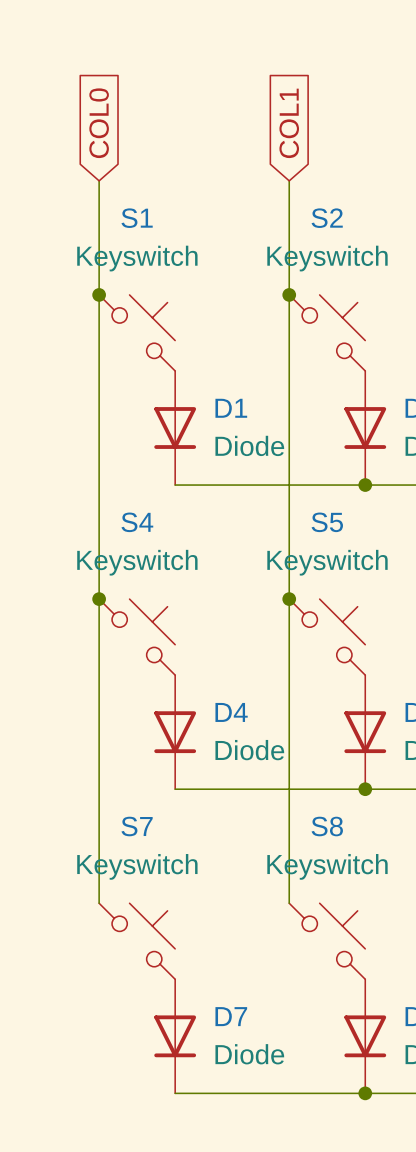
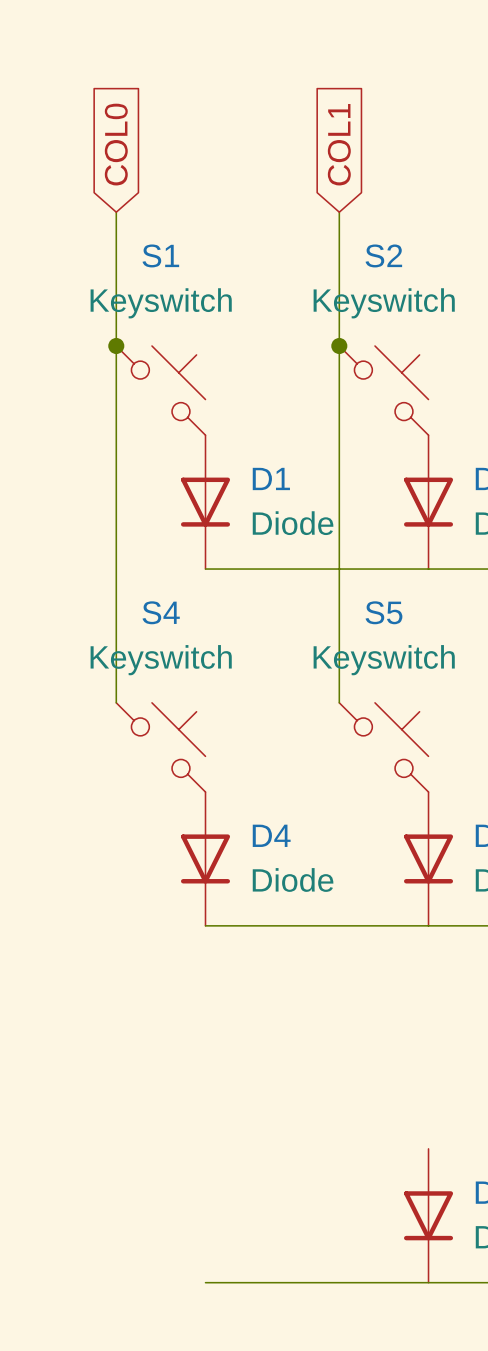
junction: (365, 485) -> none
wire: (99, 599) (99, 903) -> none
junction: (99, 599) -> none
wire: (289, 599) (289, 903) -> none
junction: (289, 599) -> none
junction: (365, 789) -> none
S7: Keyswitch (137, 941) -> none
S8: Keyswitch (327, 941) -> none
D7: Diode (175, 1036) -> none
junction: (365, 1093) -> none

